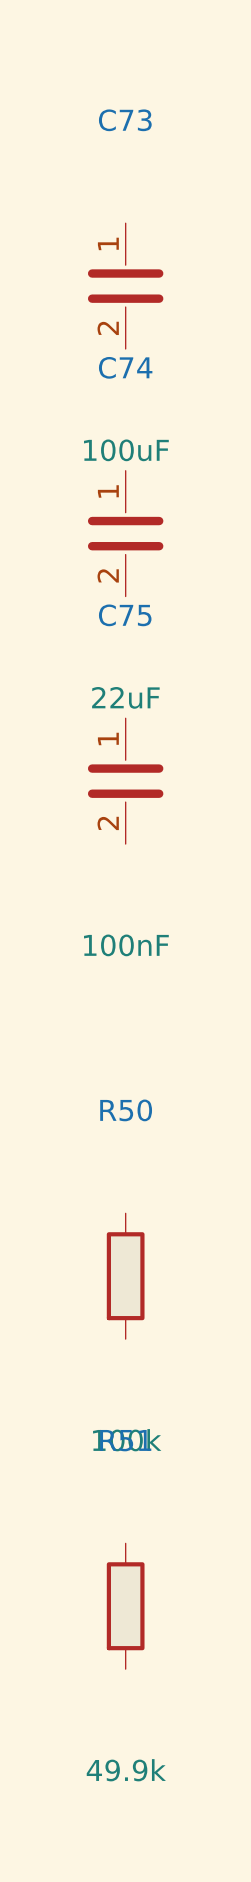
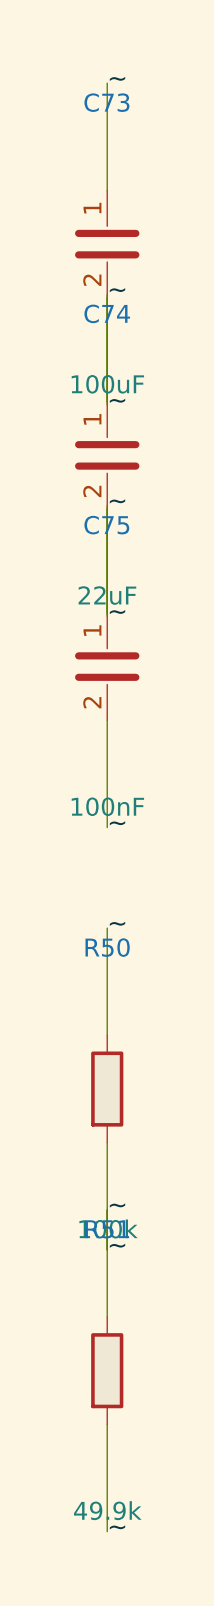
label: none -> ~ (117, 78)
wire: none -> (107, 83) (107, 190)
label: none -> ~ (117, 290)
wire: none -> (107, 294) (107, 405)
label: none -> ~ (117, 400)
label: none -> ~ (117, 501)
wire: none -> (107, 505) (107, 616)
label: none -> ~ (117, 612)
wire: none -> (107, 720) (107, 827)
label: none -> ~ (117, 823)
label: none -> ~ (117, 923)
wire: none -> (107, 928) (107, 1035)
wire: none -> (107, 1142) (107, 1317)
label: none -> ~ (117, 1205)
label: none -> ~ (117, 1245)
wire: none -> (107, 1424) (107, 1531)
label: none -> ~ (117, 1527)

